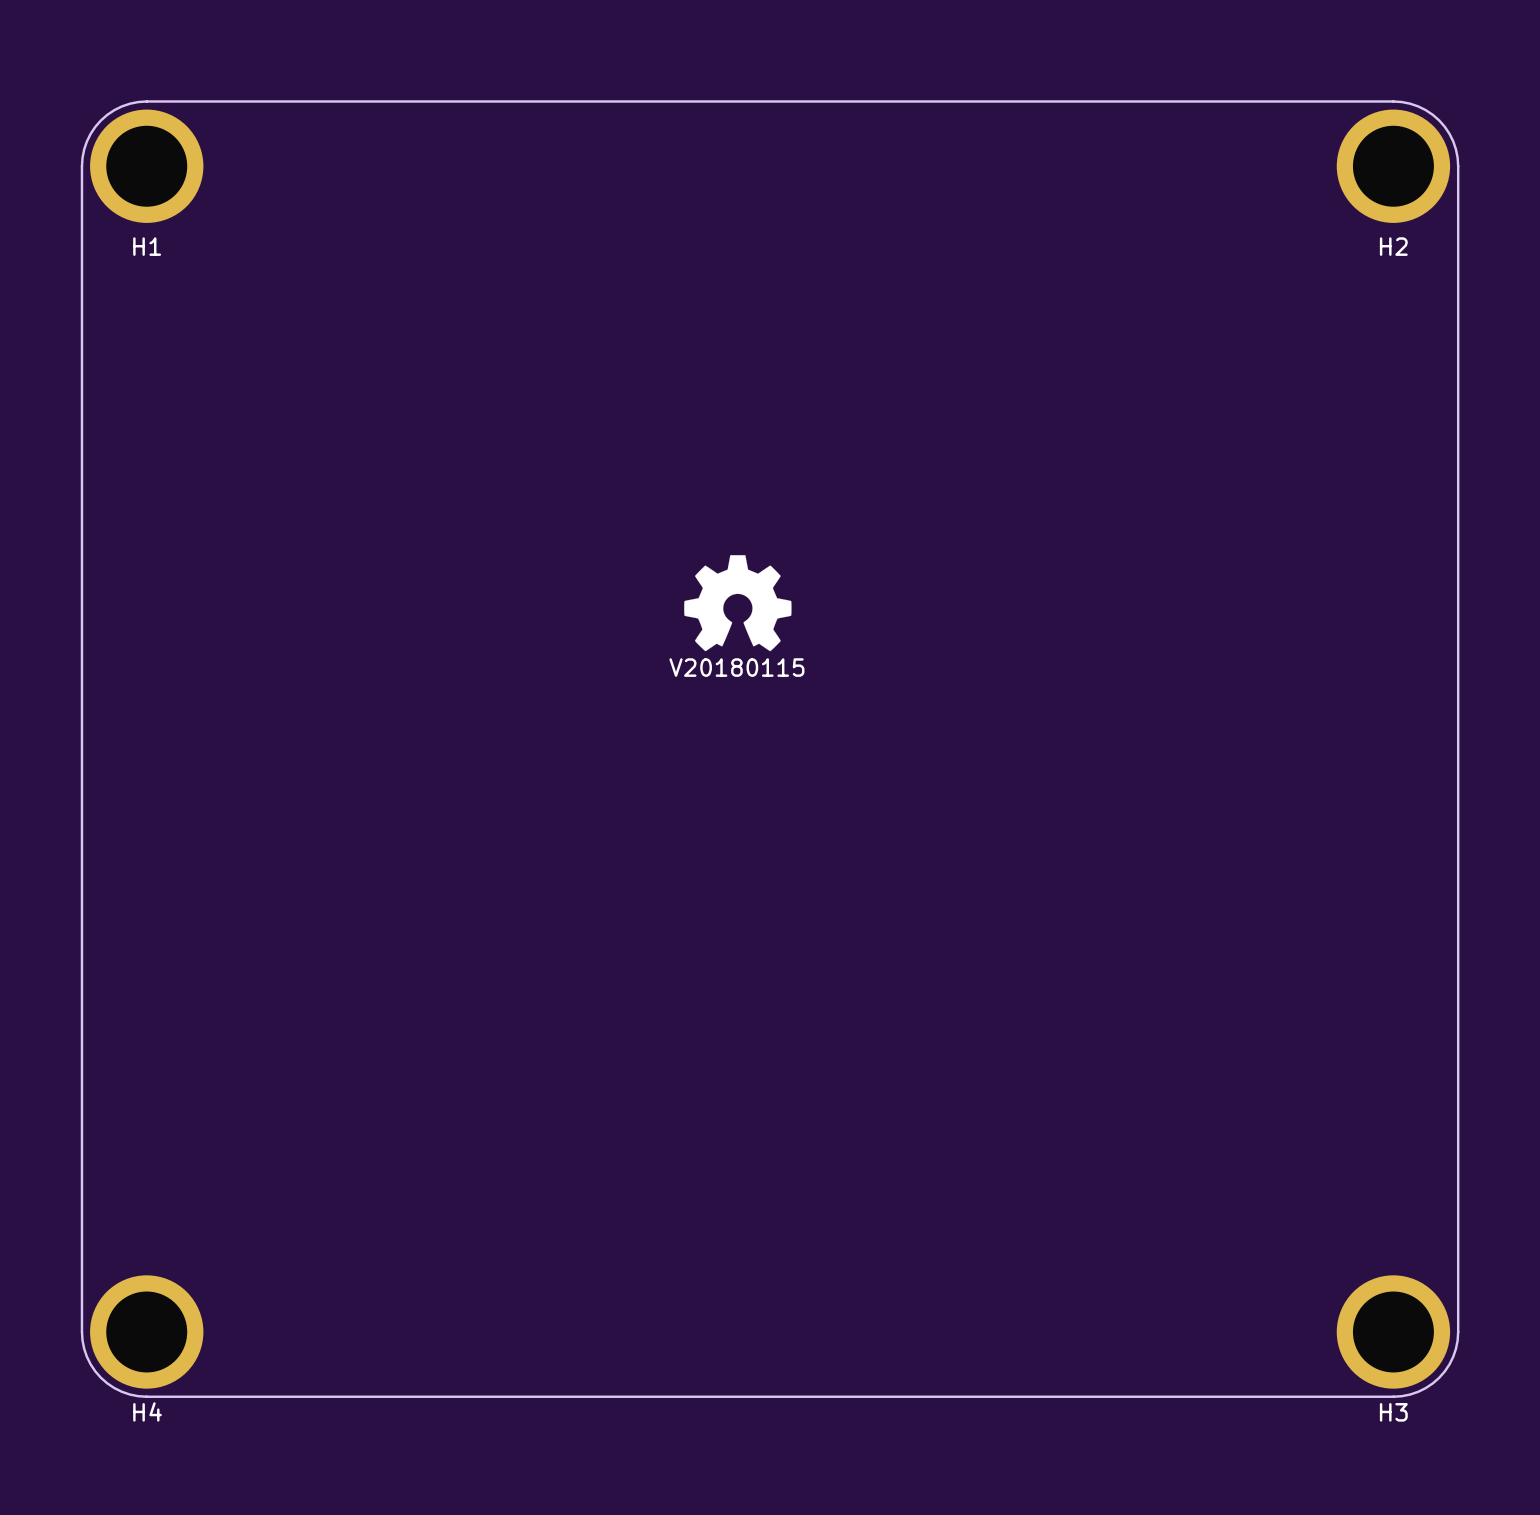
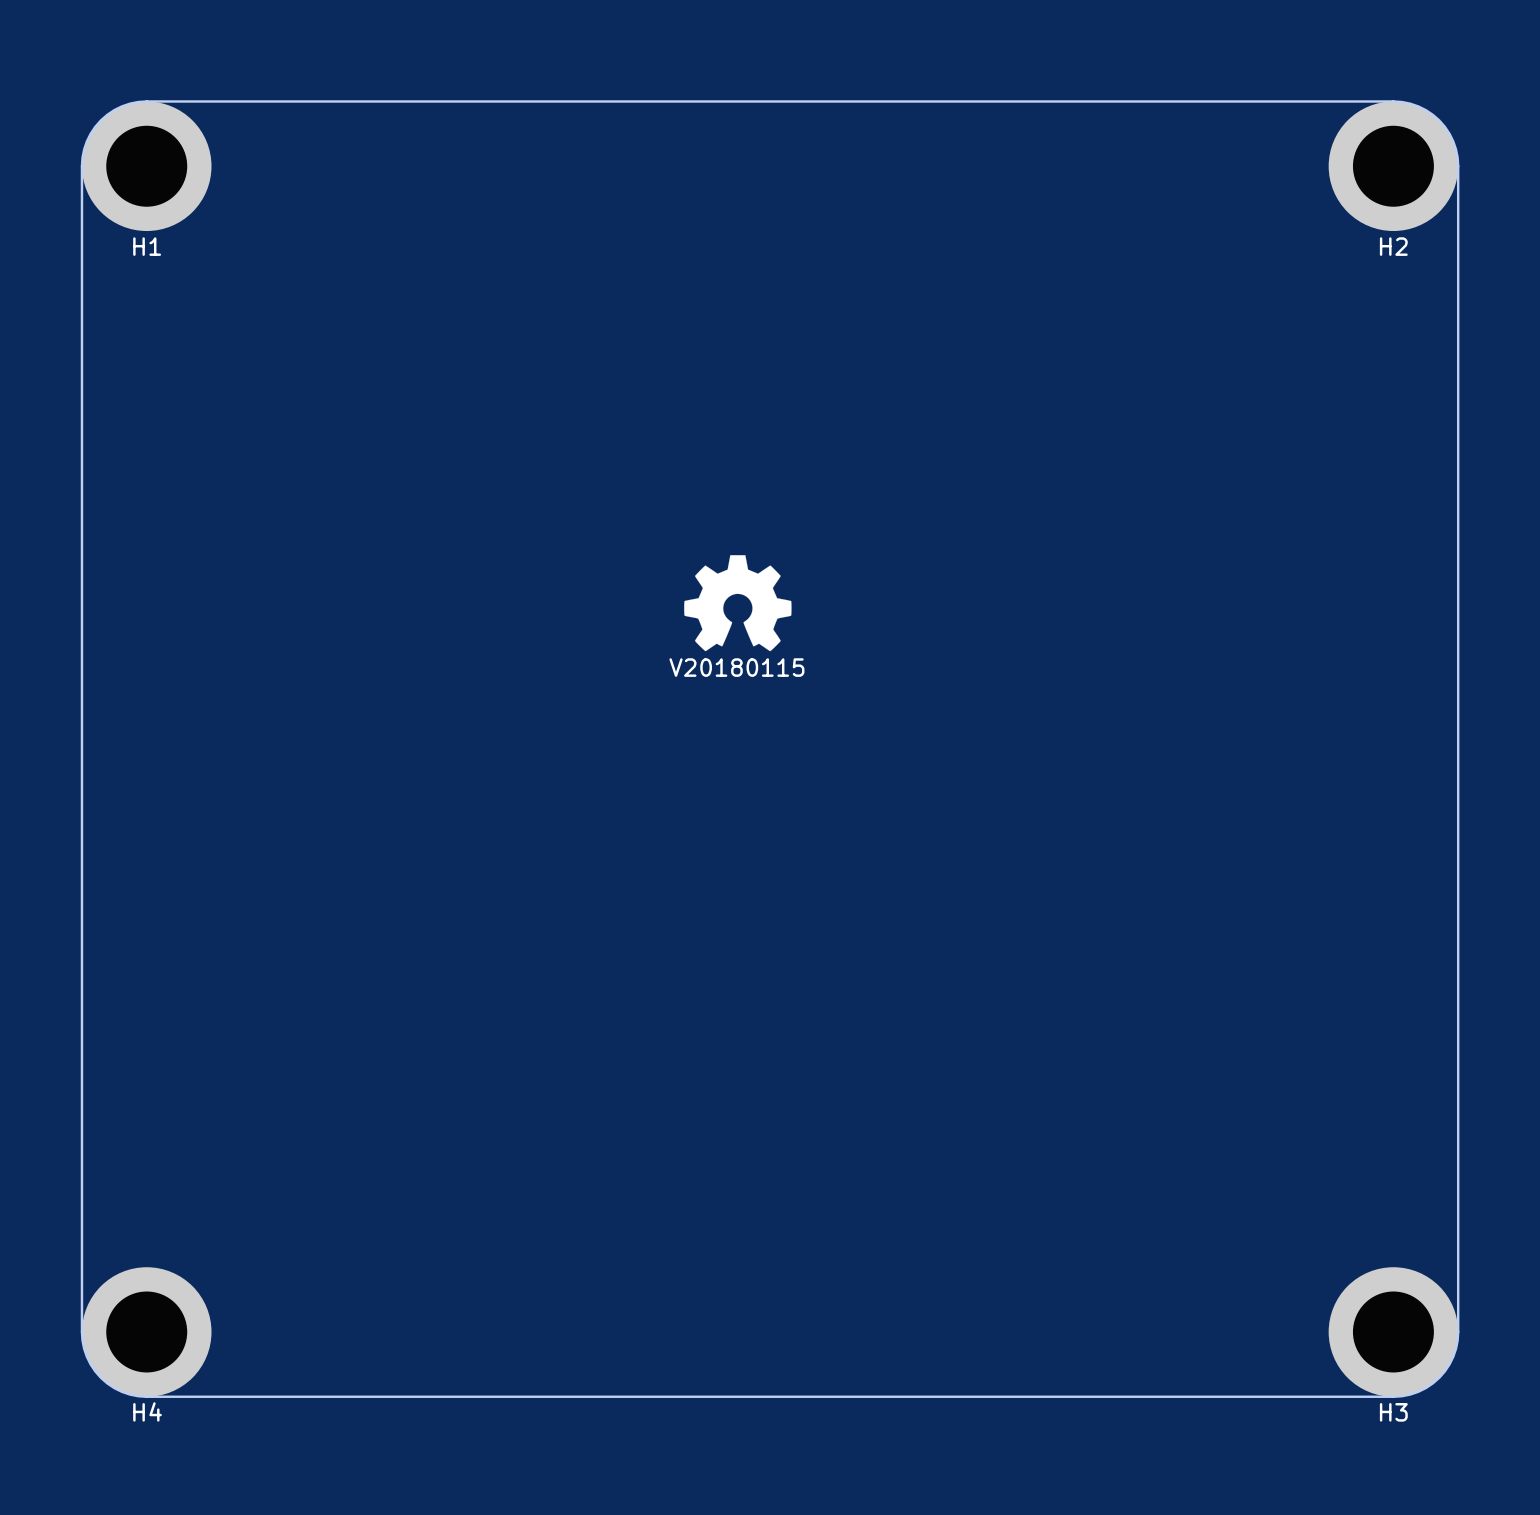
H1 footprint: [90, 109, 204, 223] -> [81, 101, 212, 232]
H2 footprint: [1336, 109, 1451, 223] -> [1328, 101, 1459, 232]
H4 footprint: [90, 1275, 204, 1389] -> [81, 1267, 212, 1397]
H3 footprint: [1336, 1275, 1451, 1389] -> [1328, 1267, 1459, 1397]

